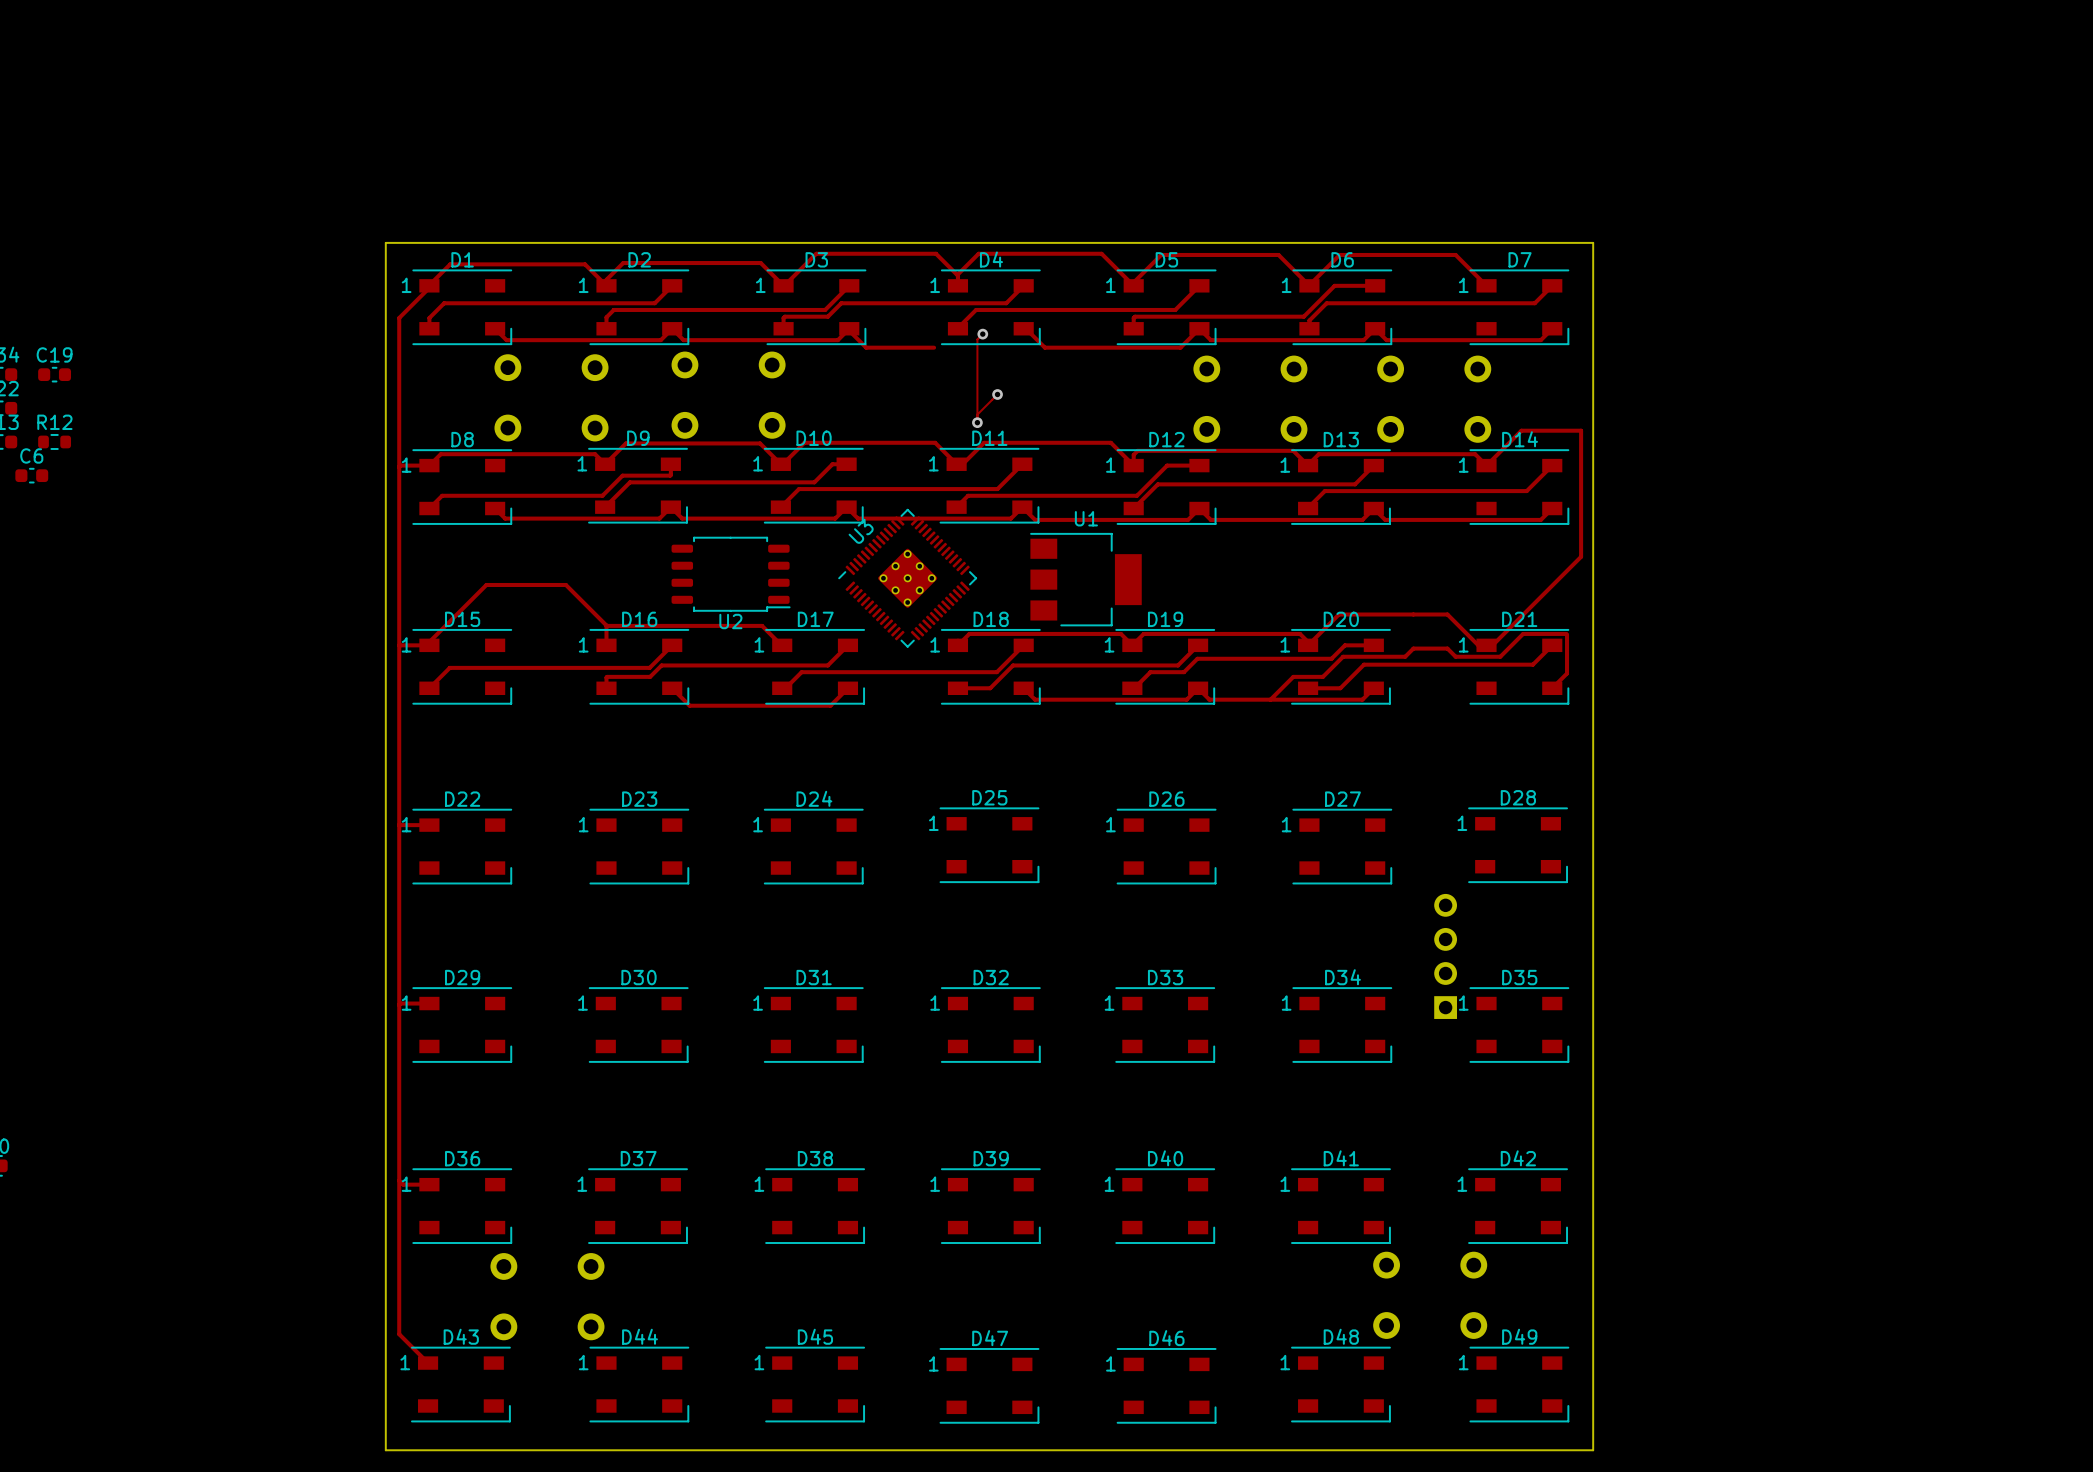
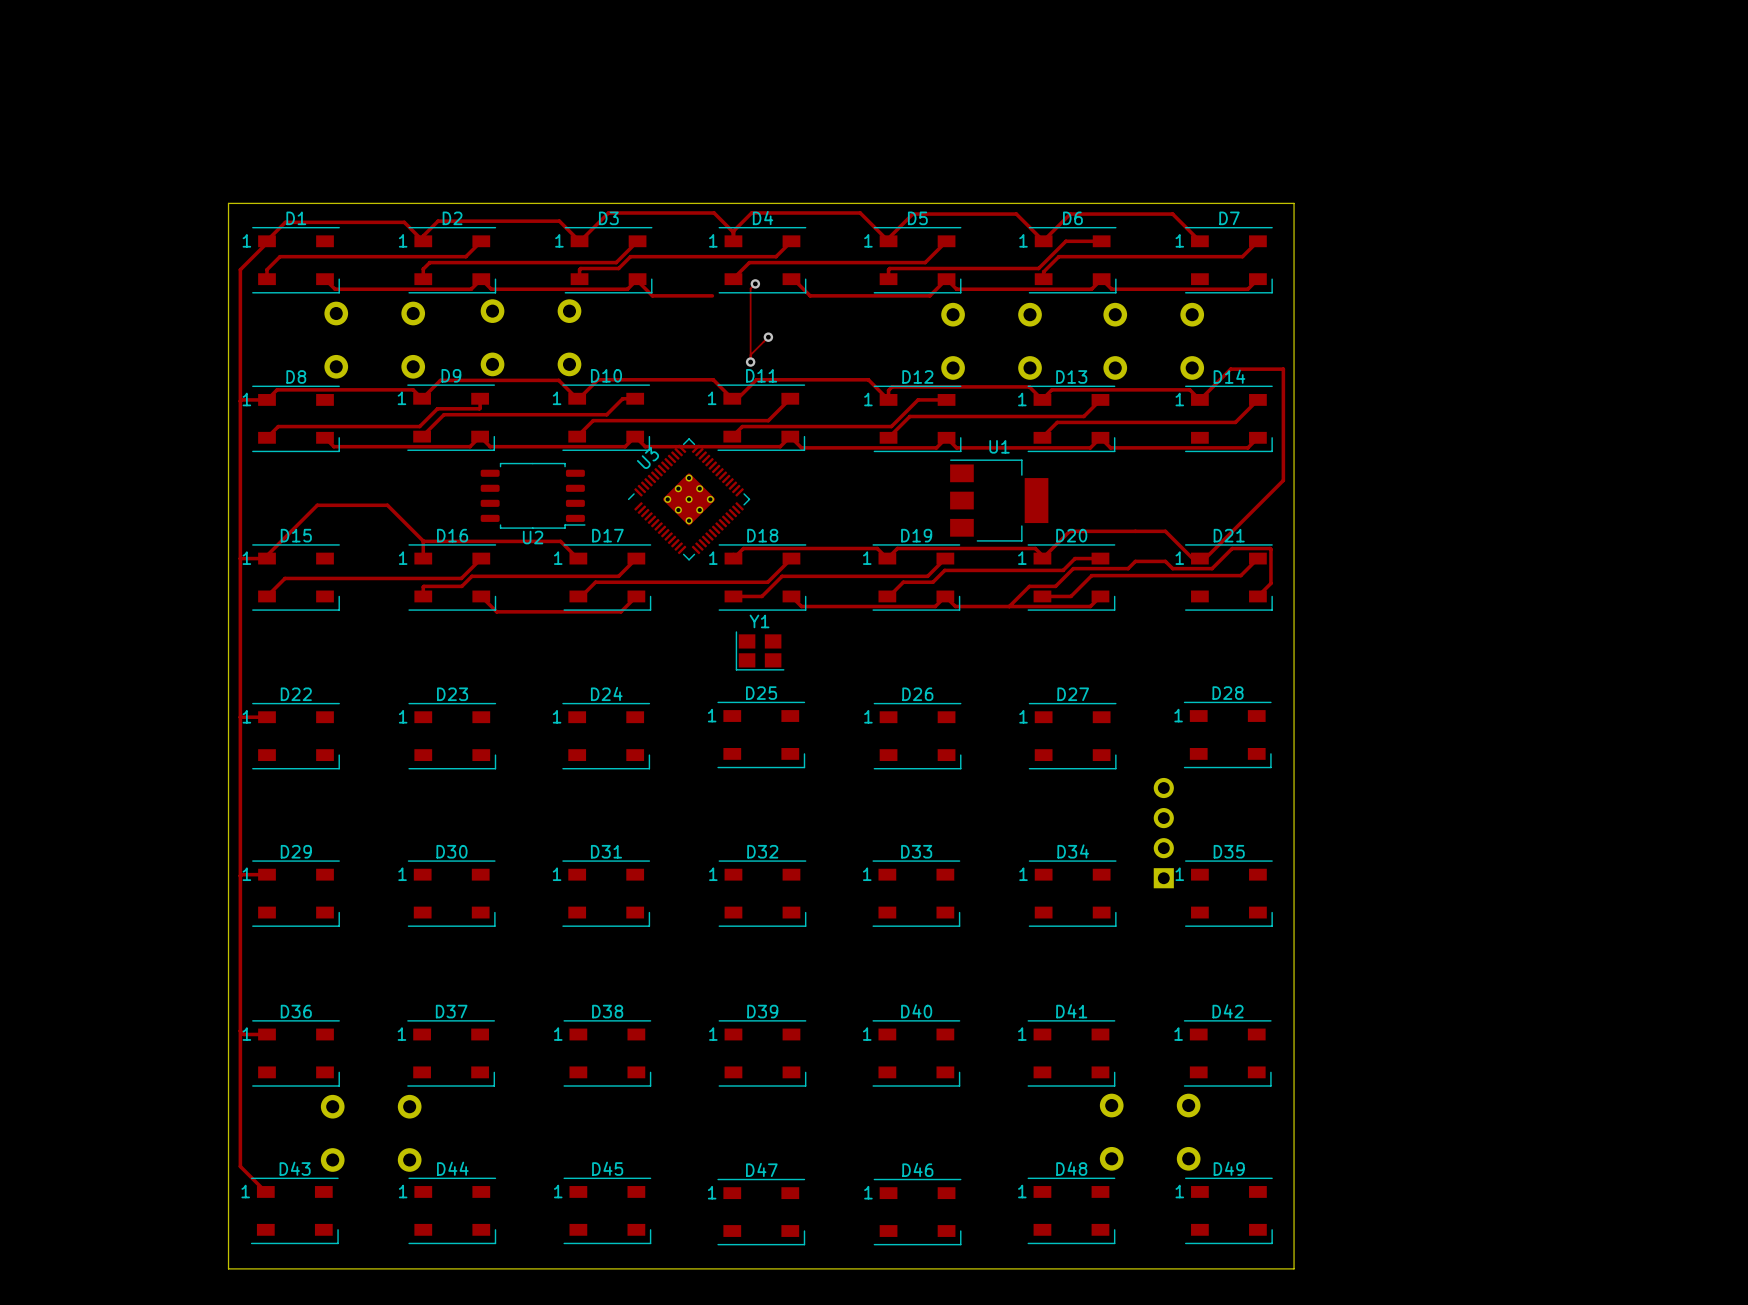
U1 position: (1086, 579) -> (999, 500)
Y1: none -> (760, 650)

